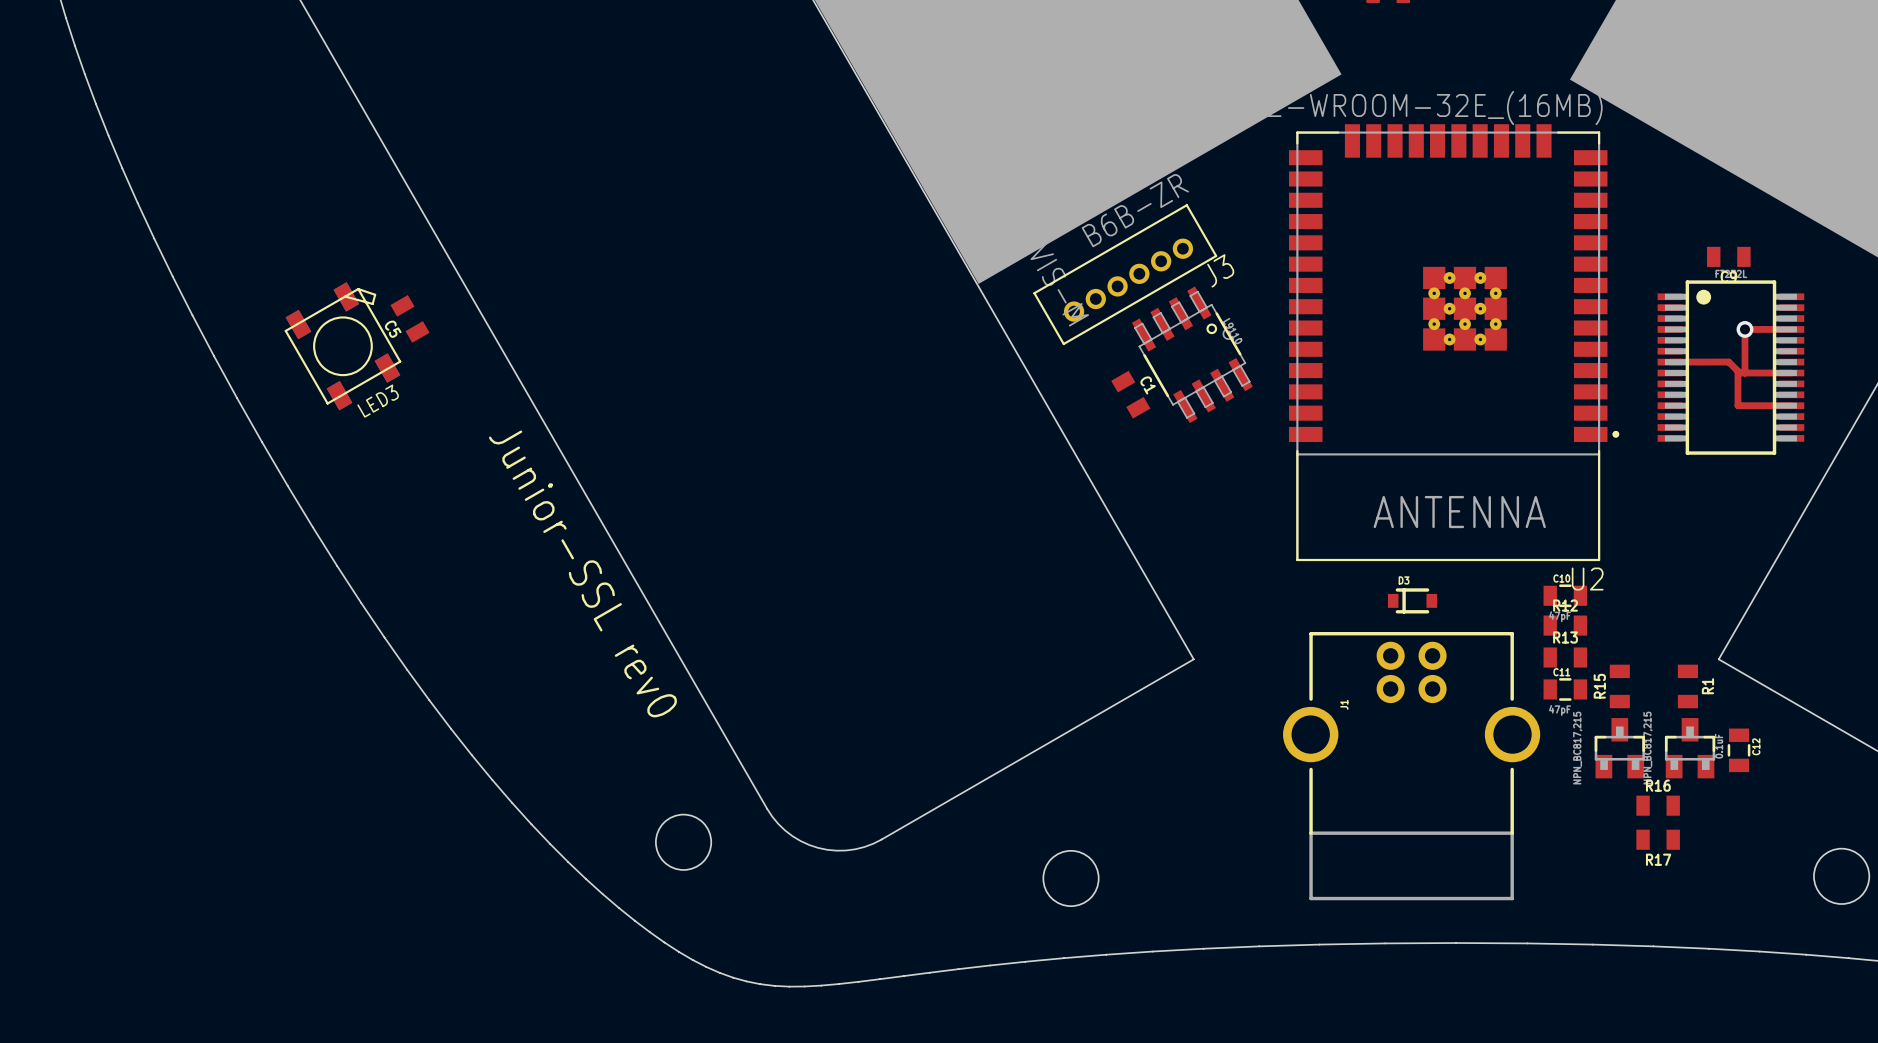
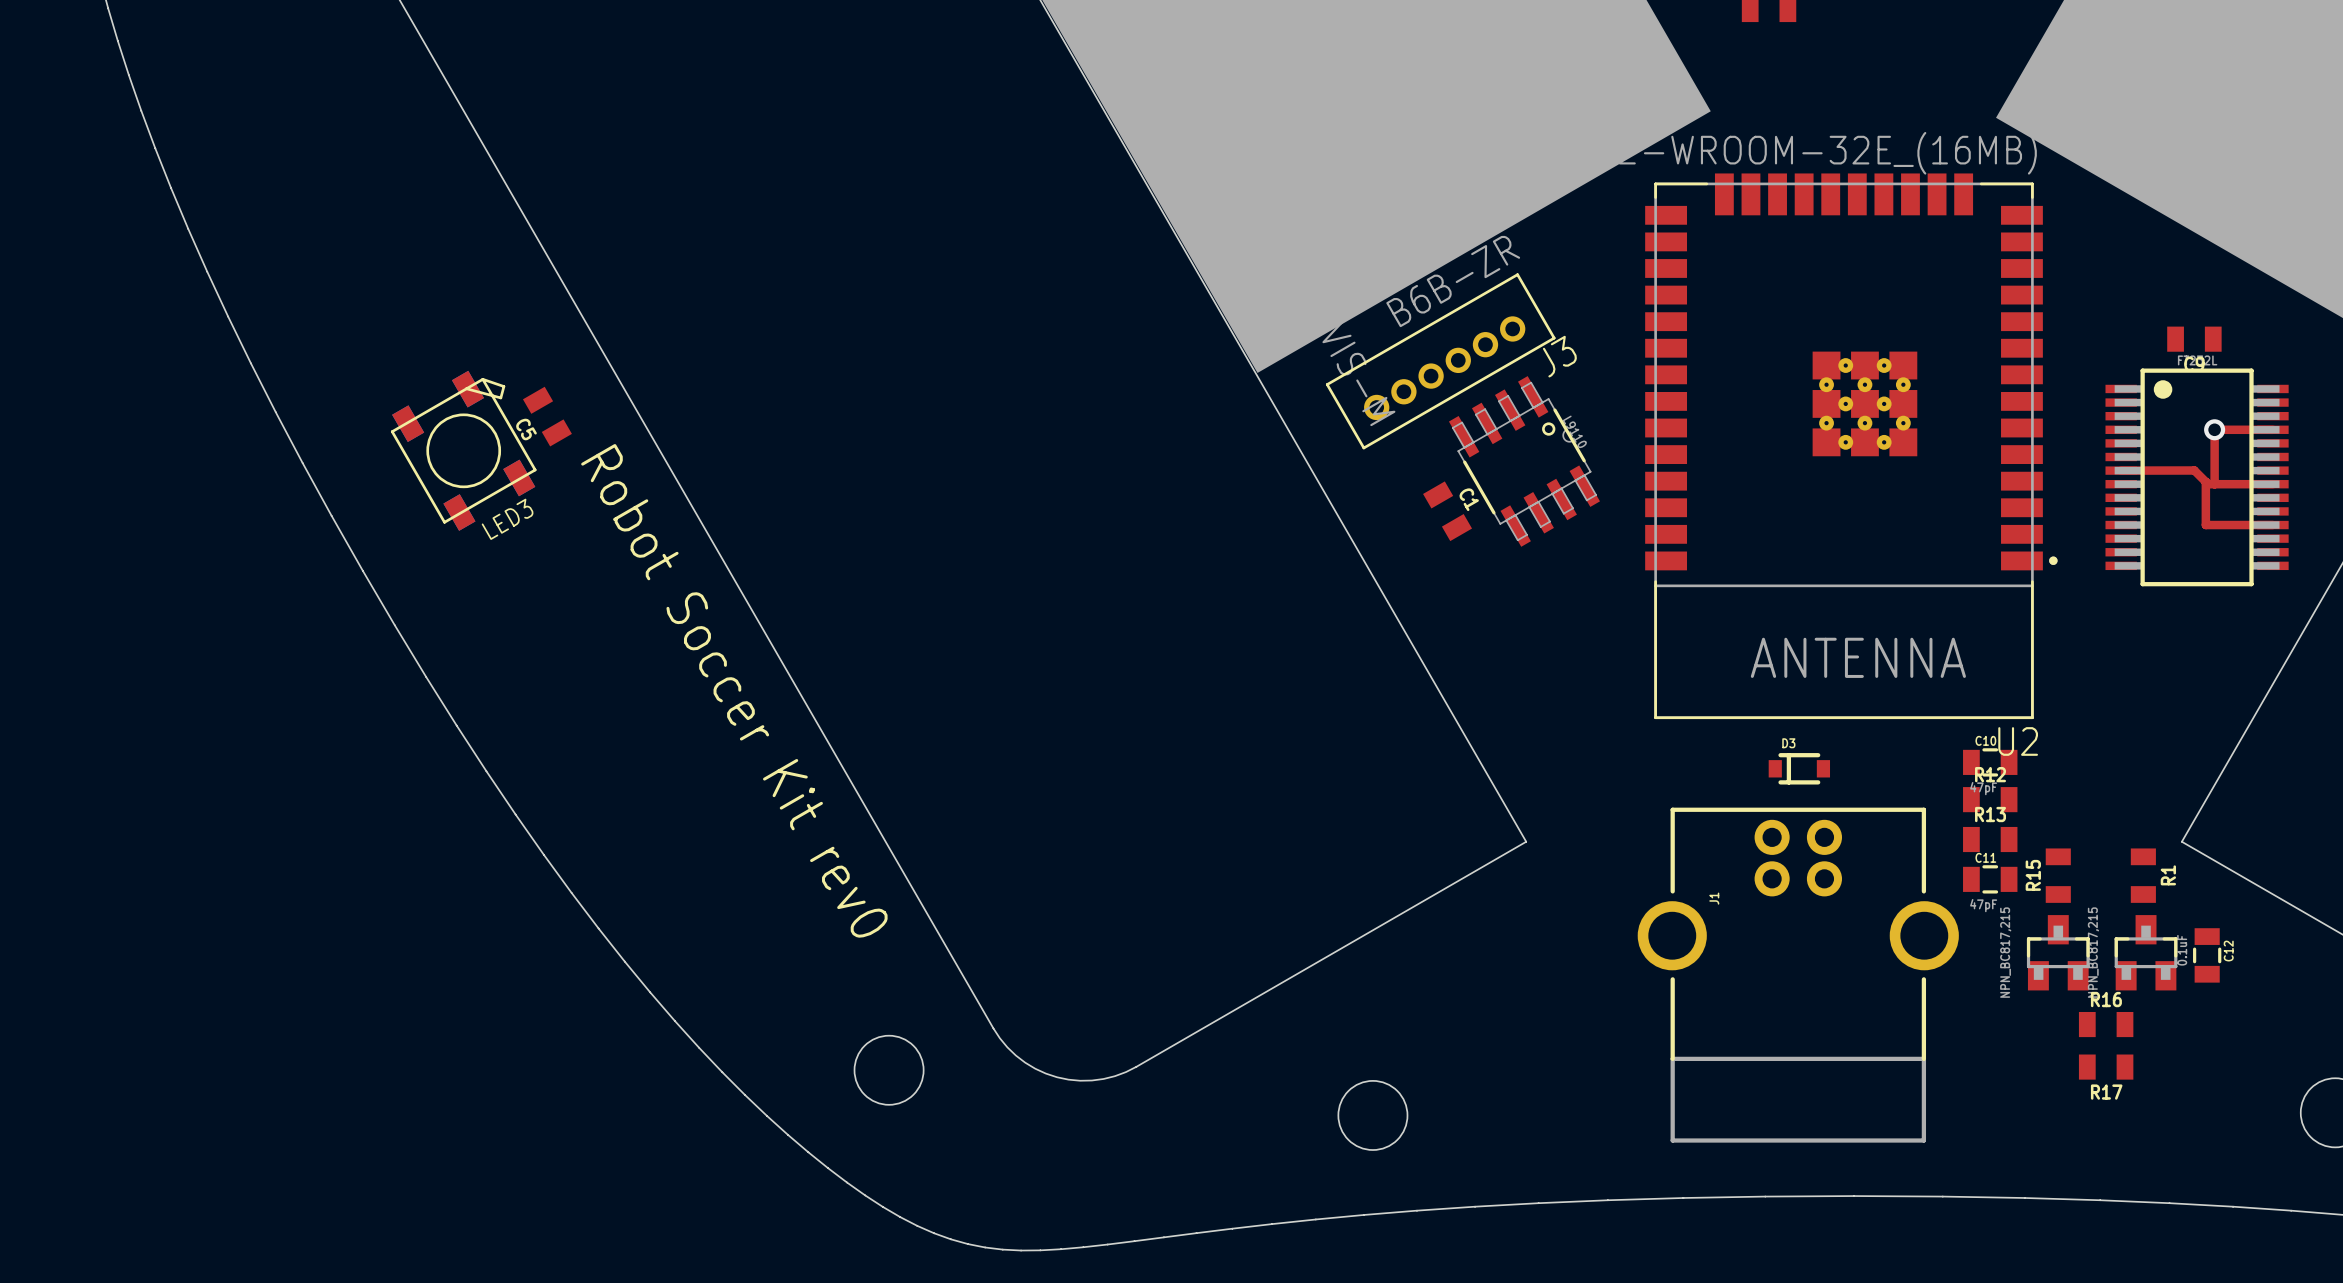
text: none -> Robot Soccer Kit rev0 (734, 690)
text: Junior-SSL rev0 (582, 573) -> none

